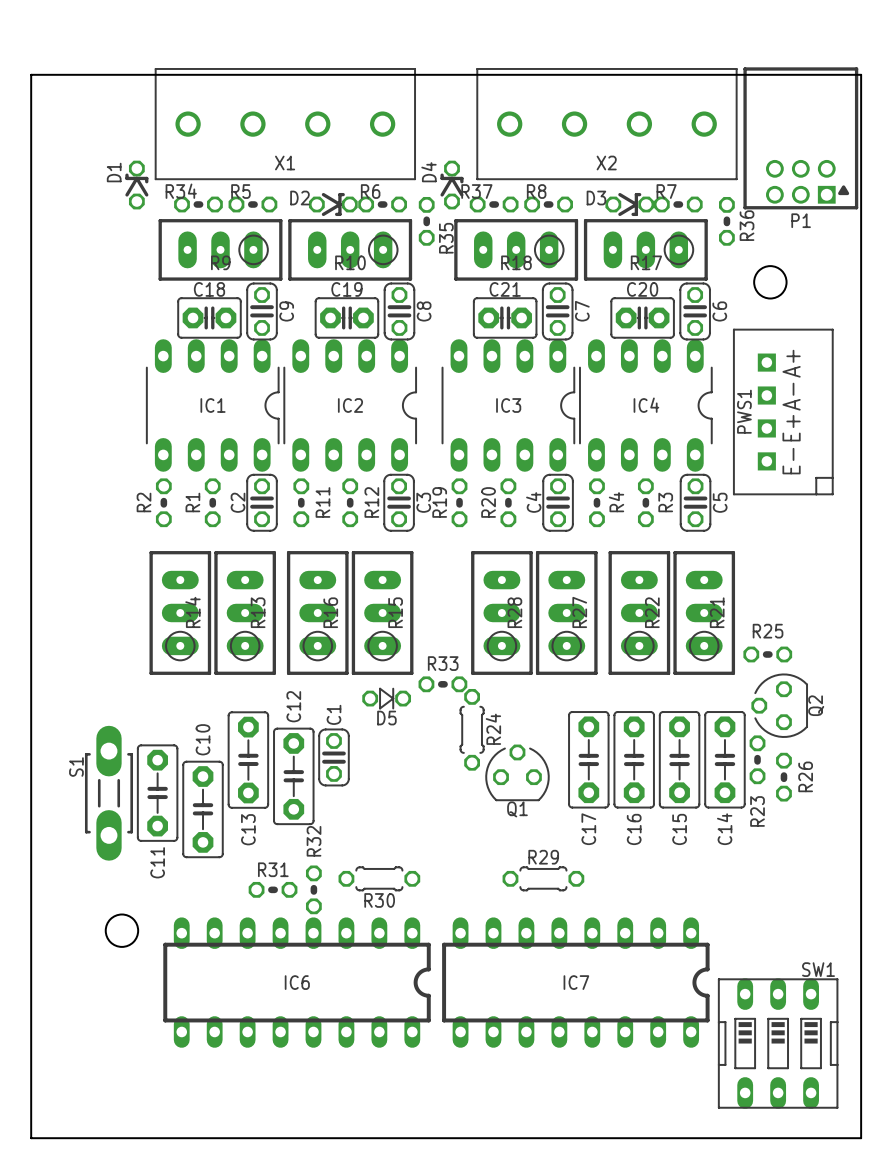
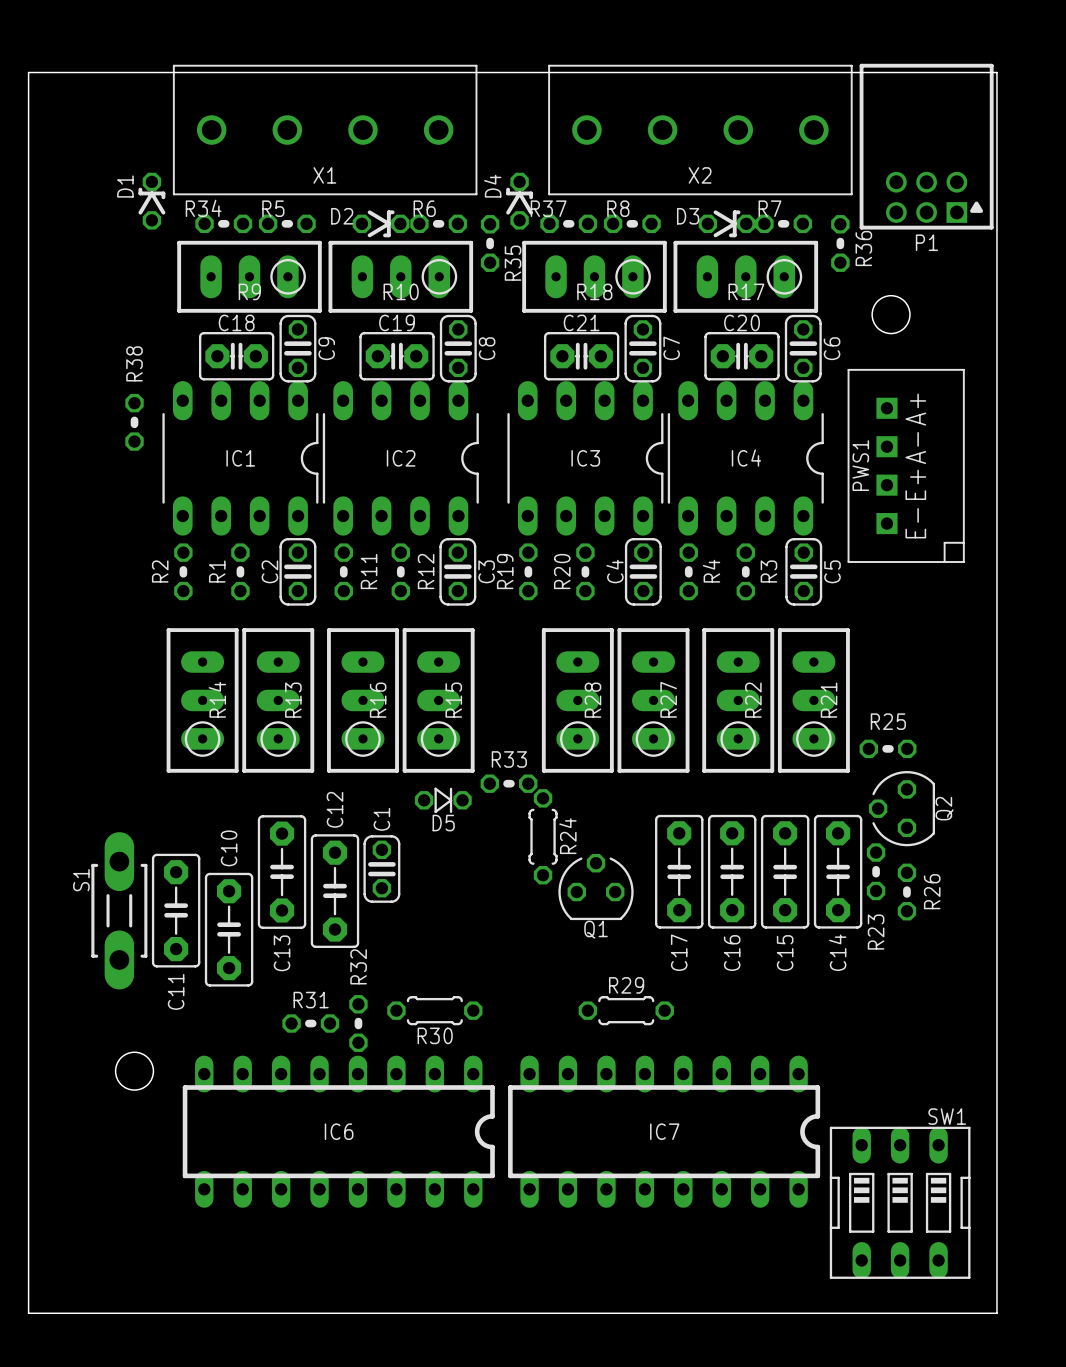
R38: none -> (134, 422)

